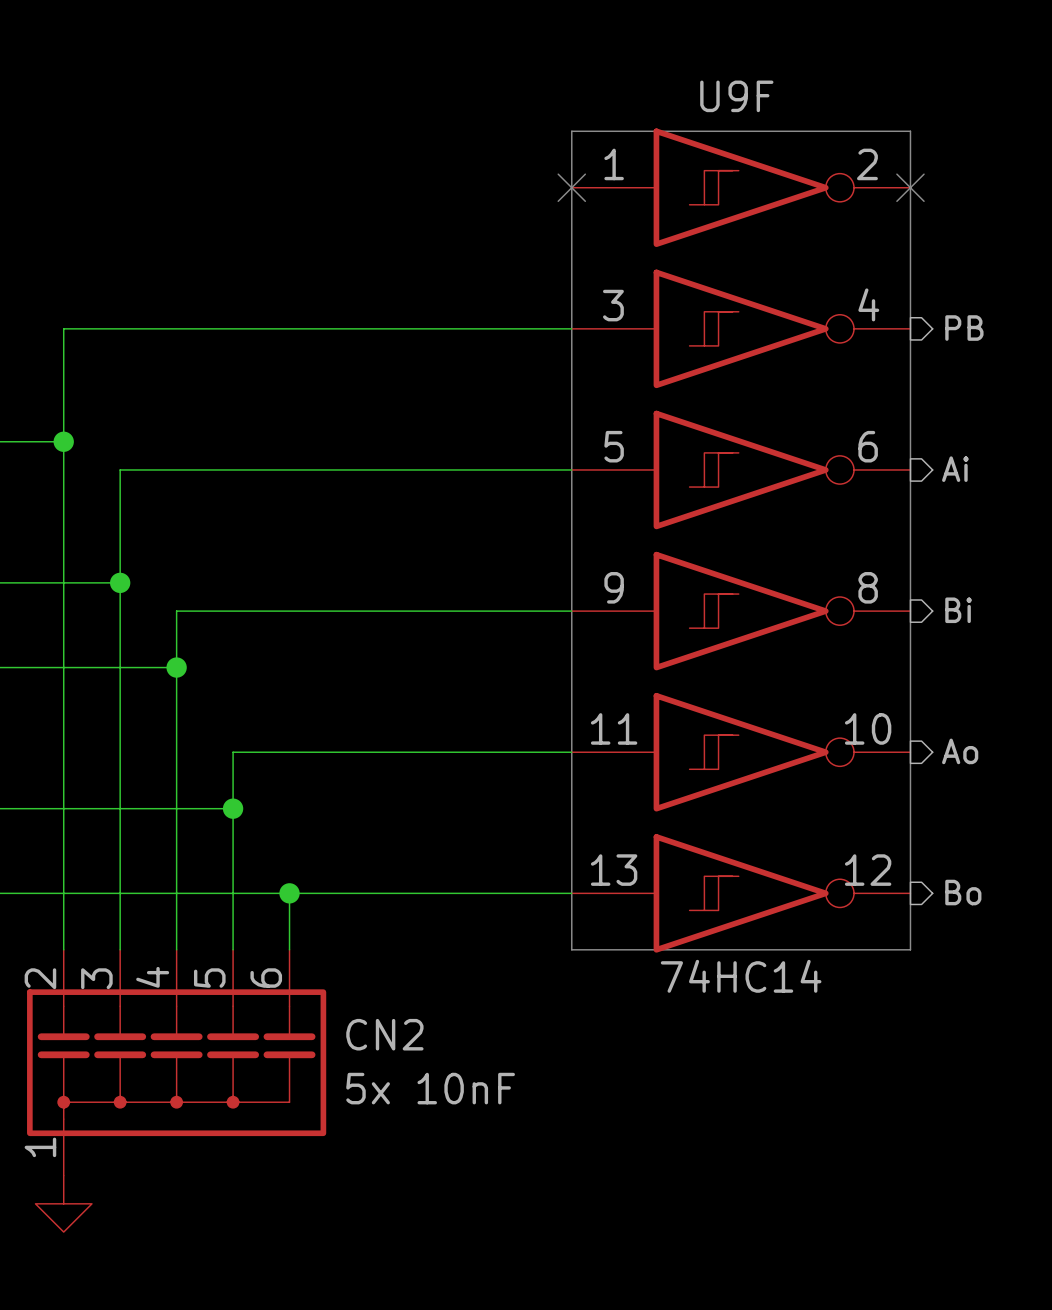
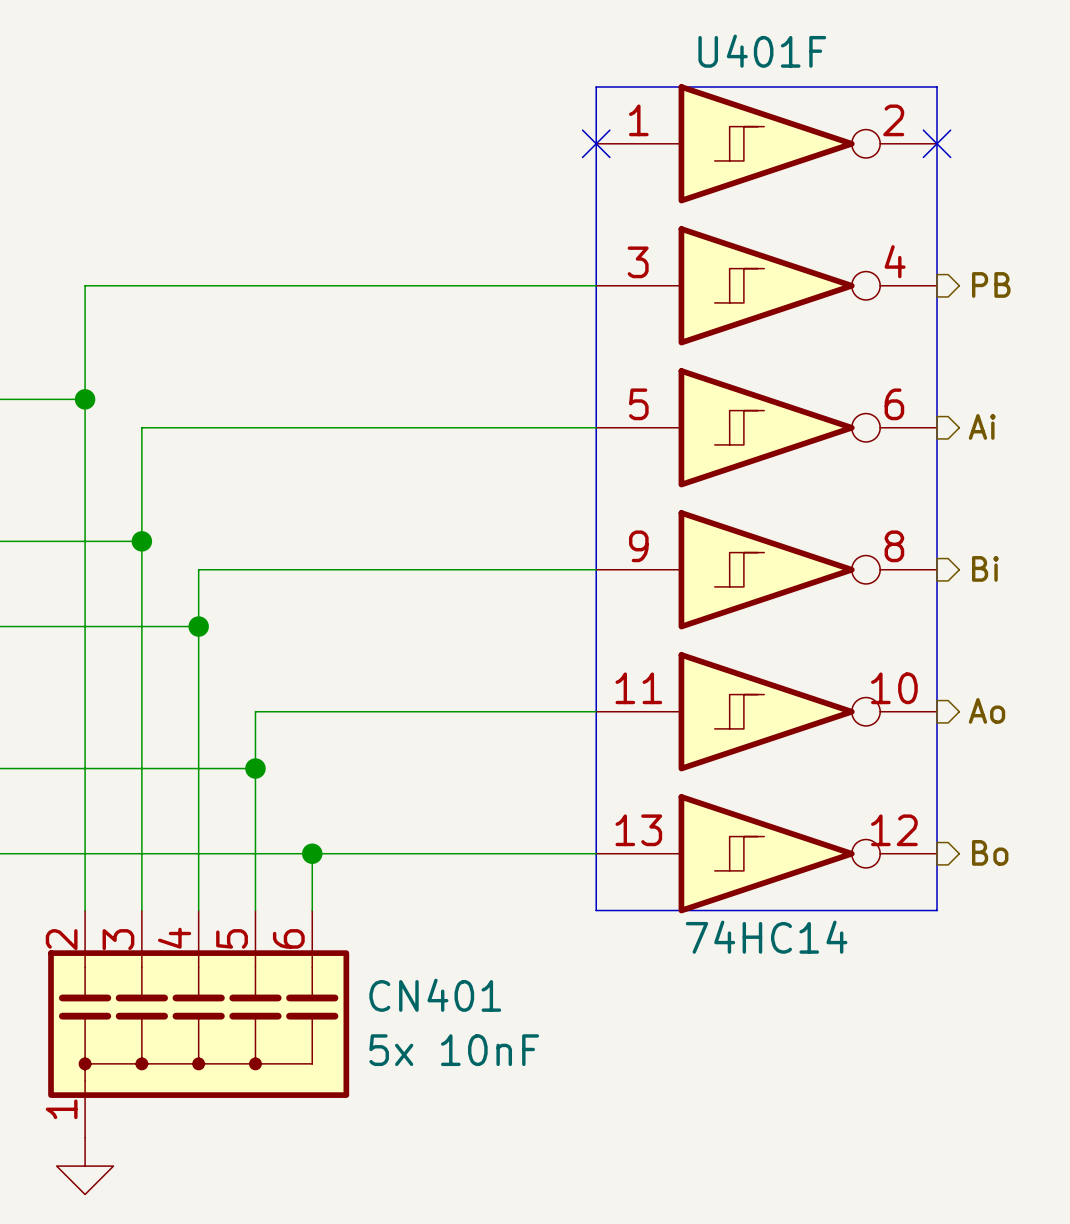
U9F name: U9F (736, 96) -> U401F (762, 51)
CN2 name: CN2 (384, 1034) -> CN401 (435, 995)

